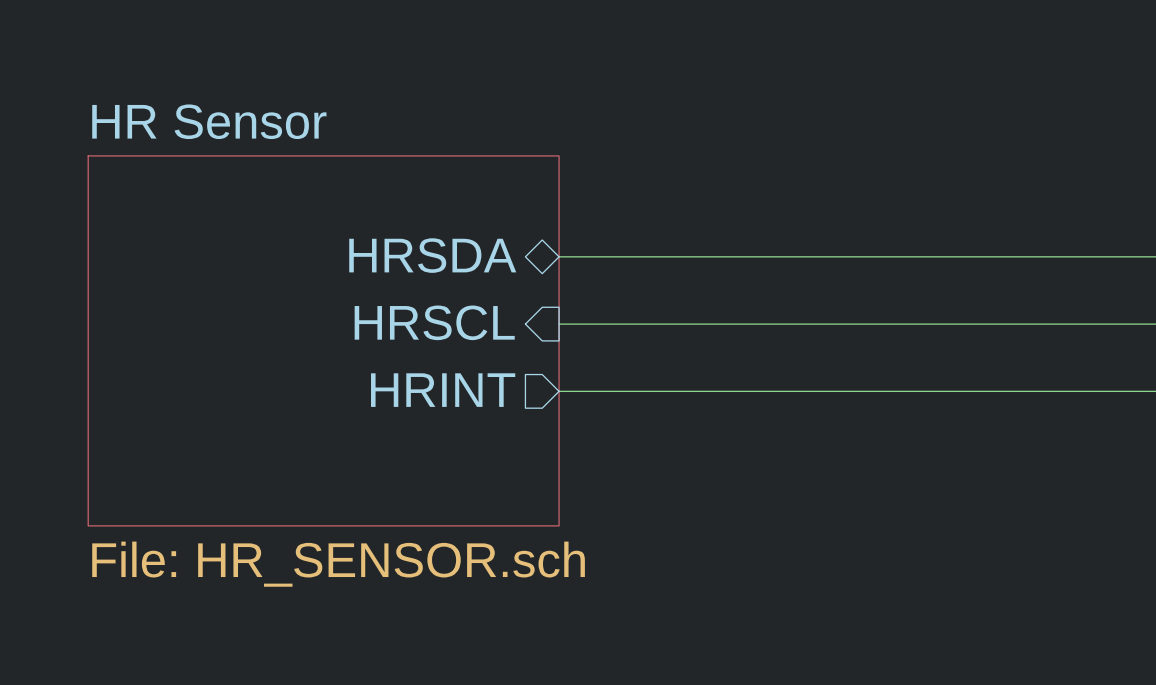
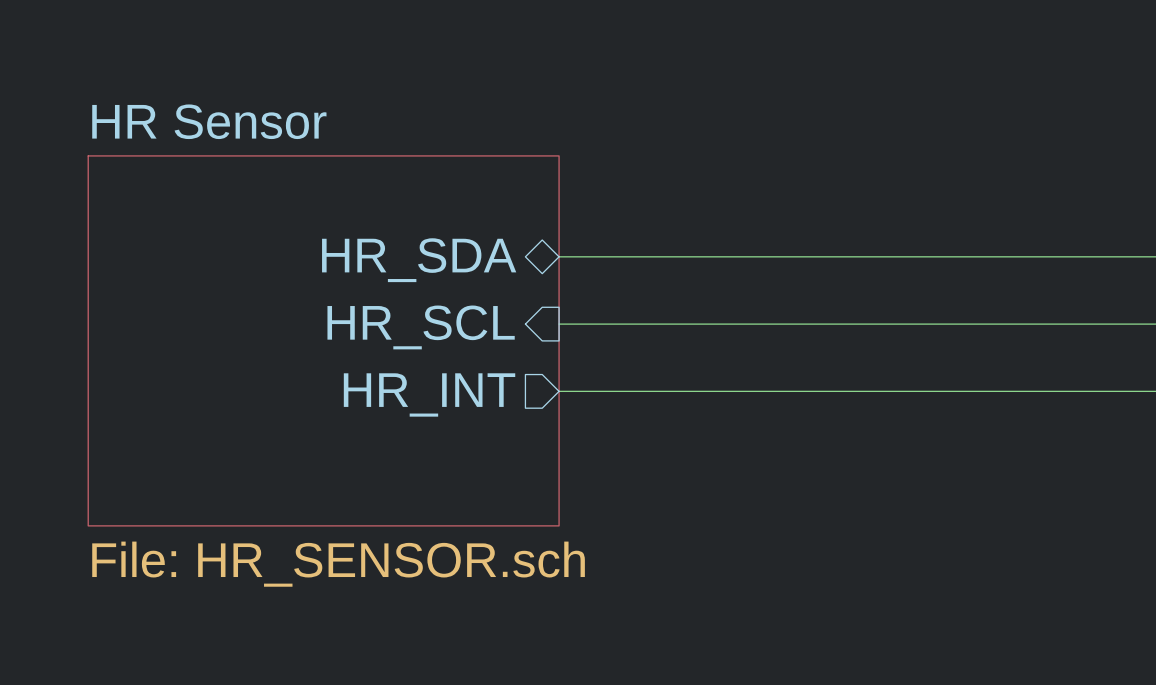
sheet pin: HRSDA (432, 255) -> HR_SDA (419, 260)
sheet pin: HRSCL (434, 322) -> HR_SCL (421, 327)
sheet pin: HRINT (443, 390) -> HR_INT (429, 394)

